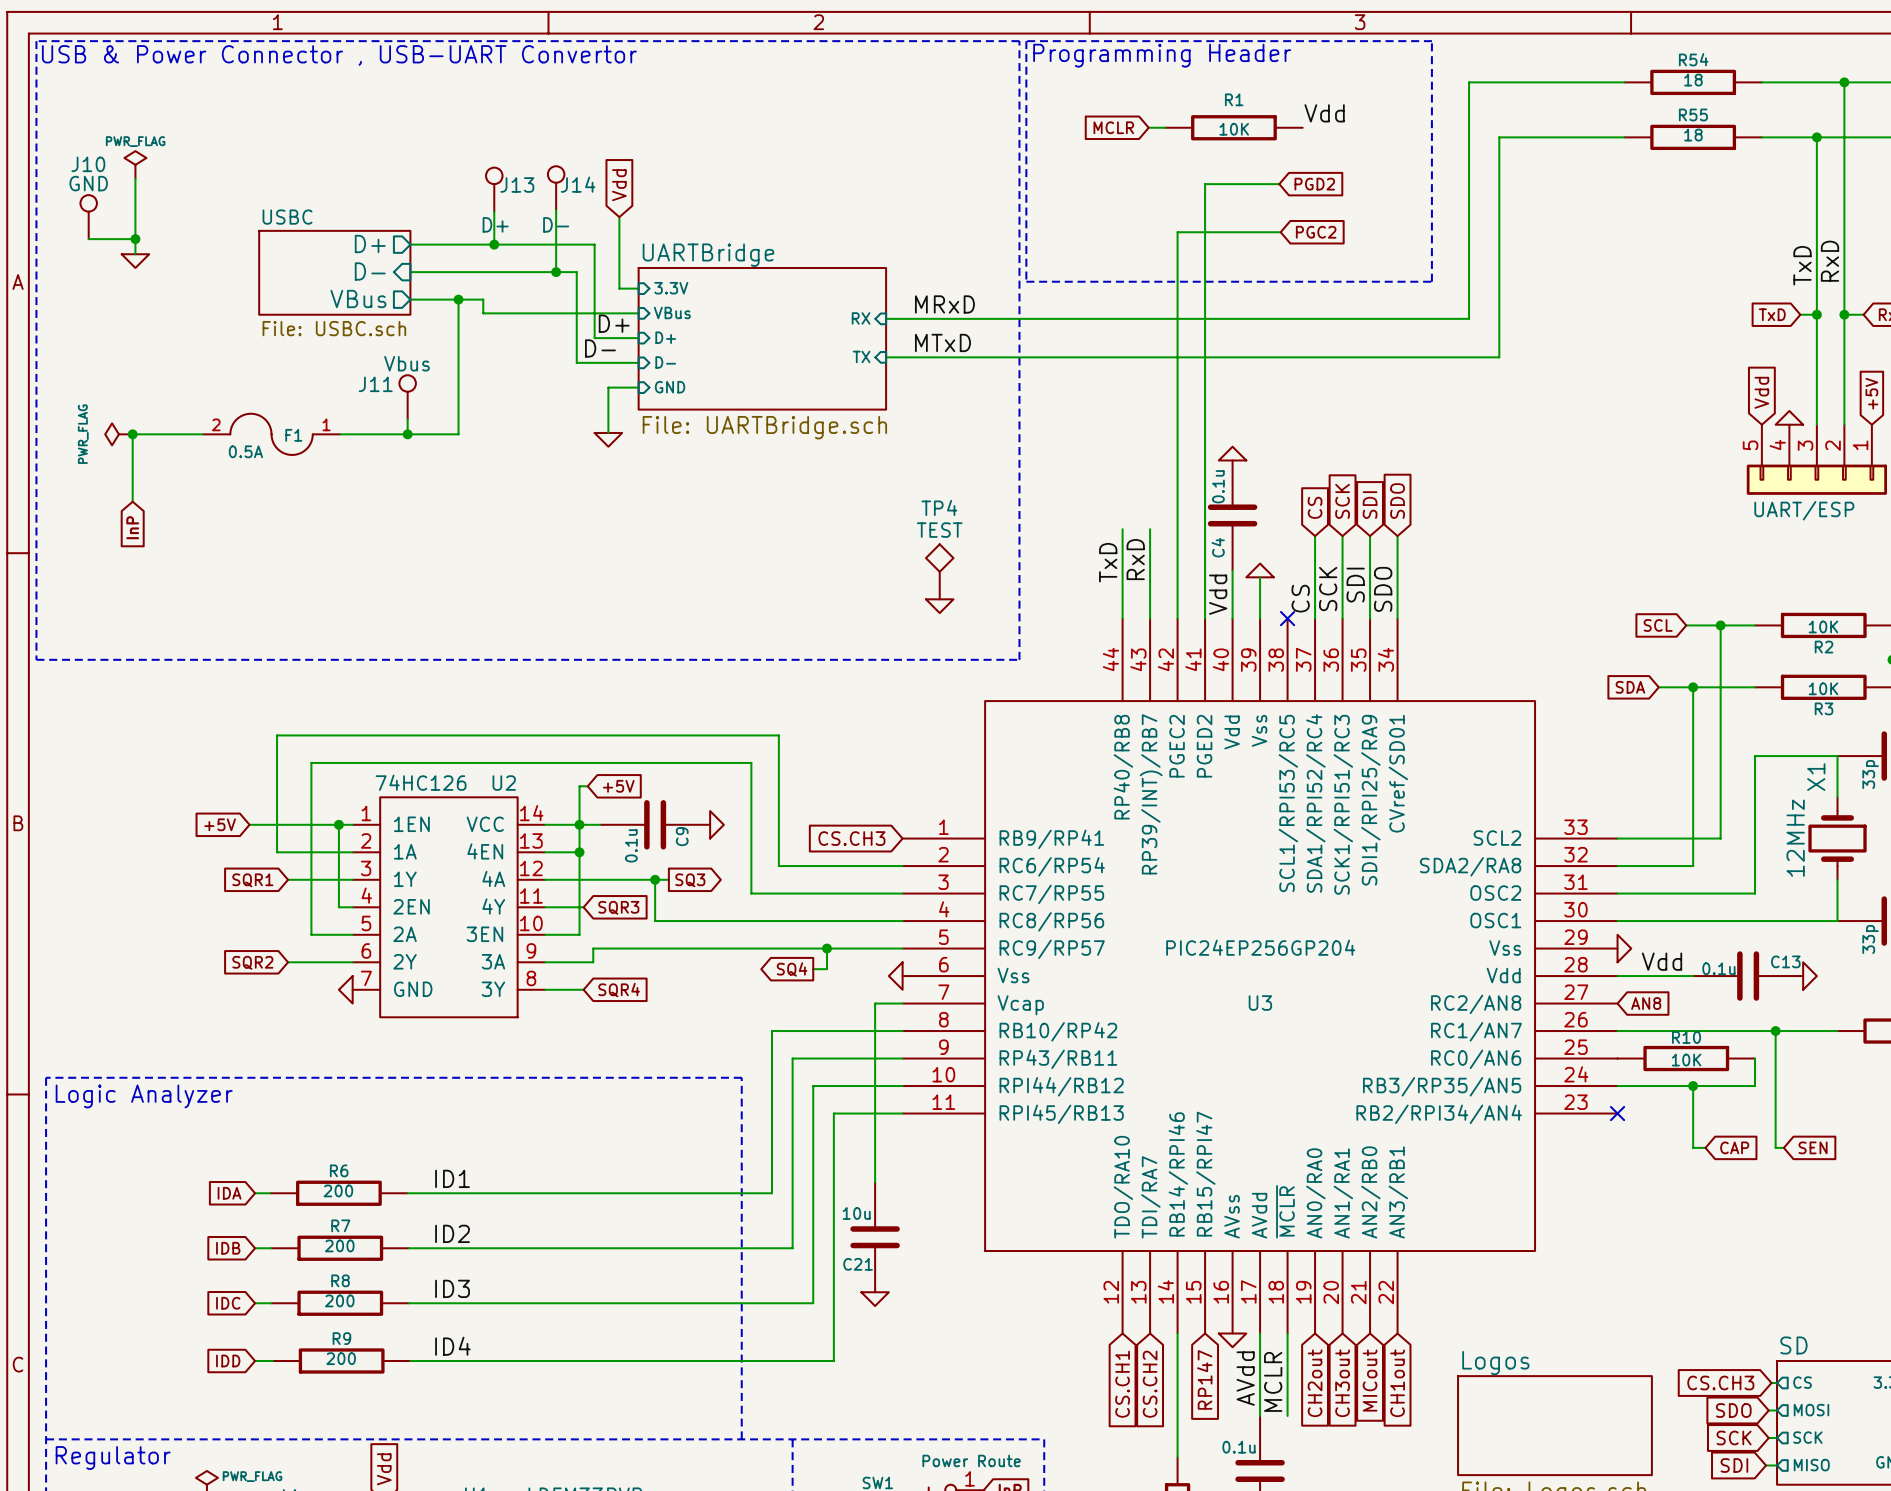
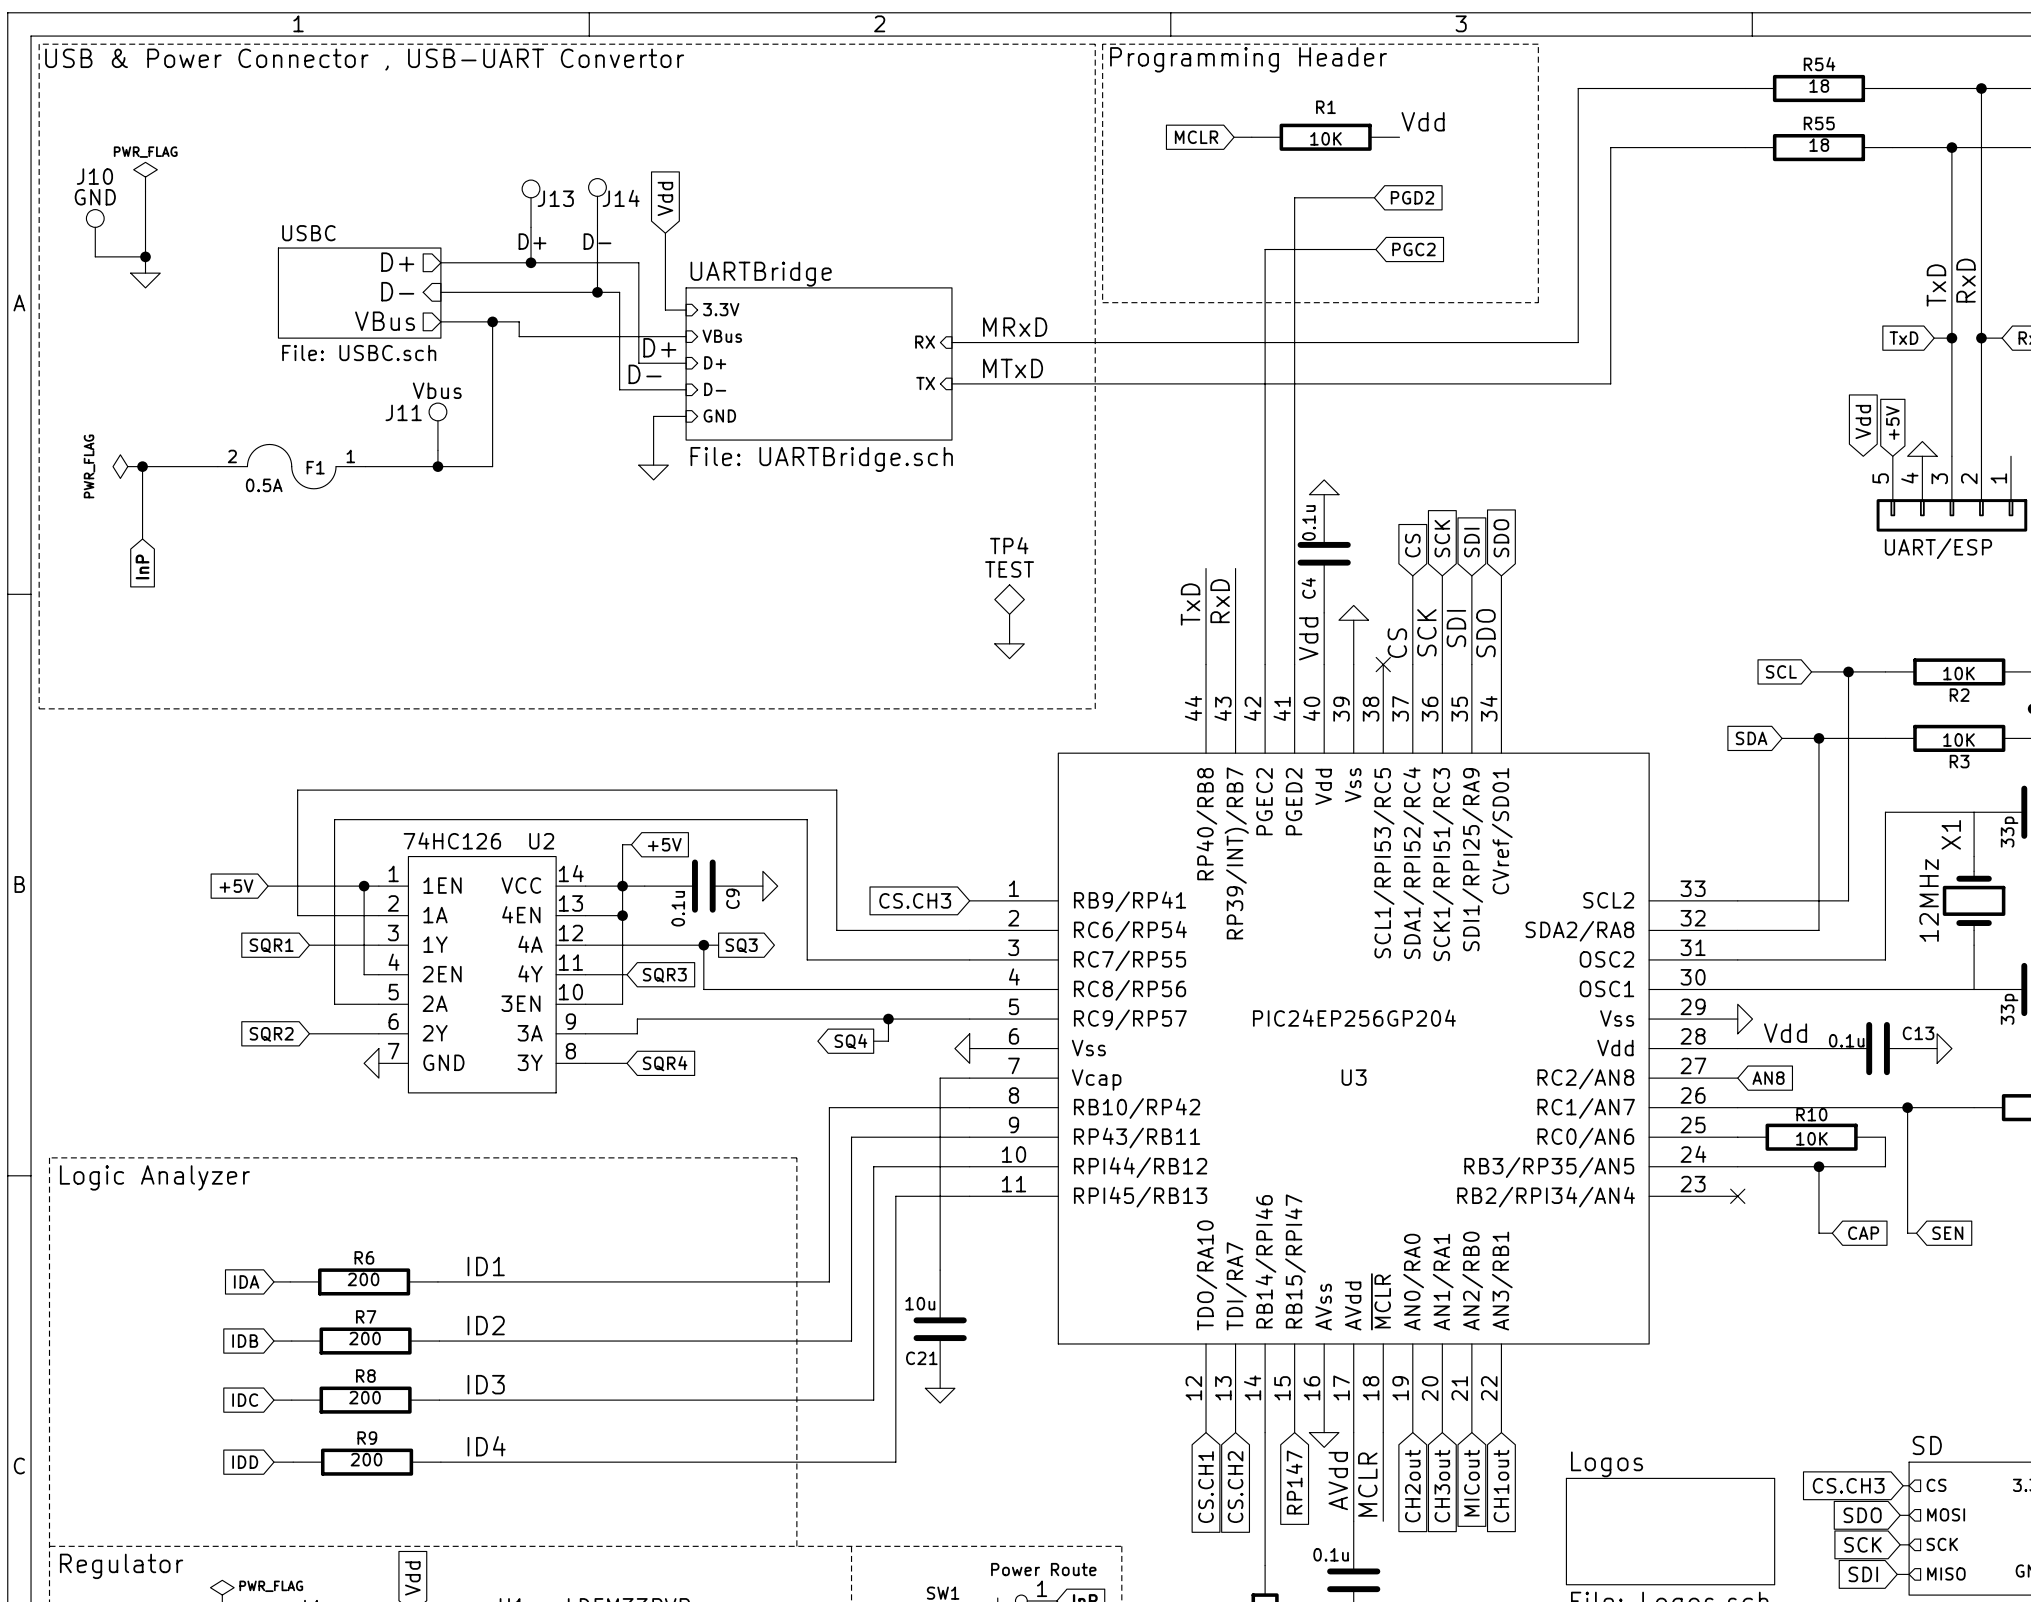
global label: none -> Vdd (1863, 421)
global label: Vdd (1761, 392) -> +5V (1892, 422)
global label: +5V (1871, 393) -> none

